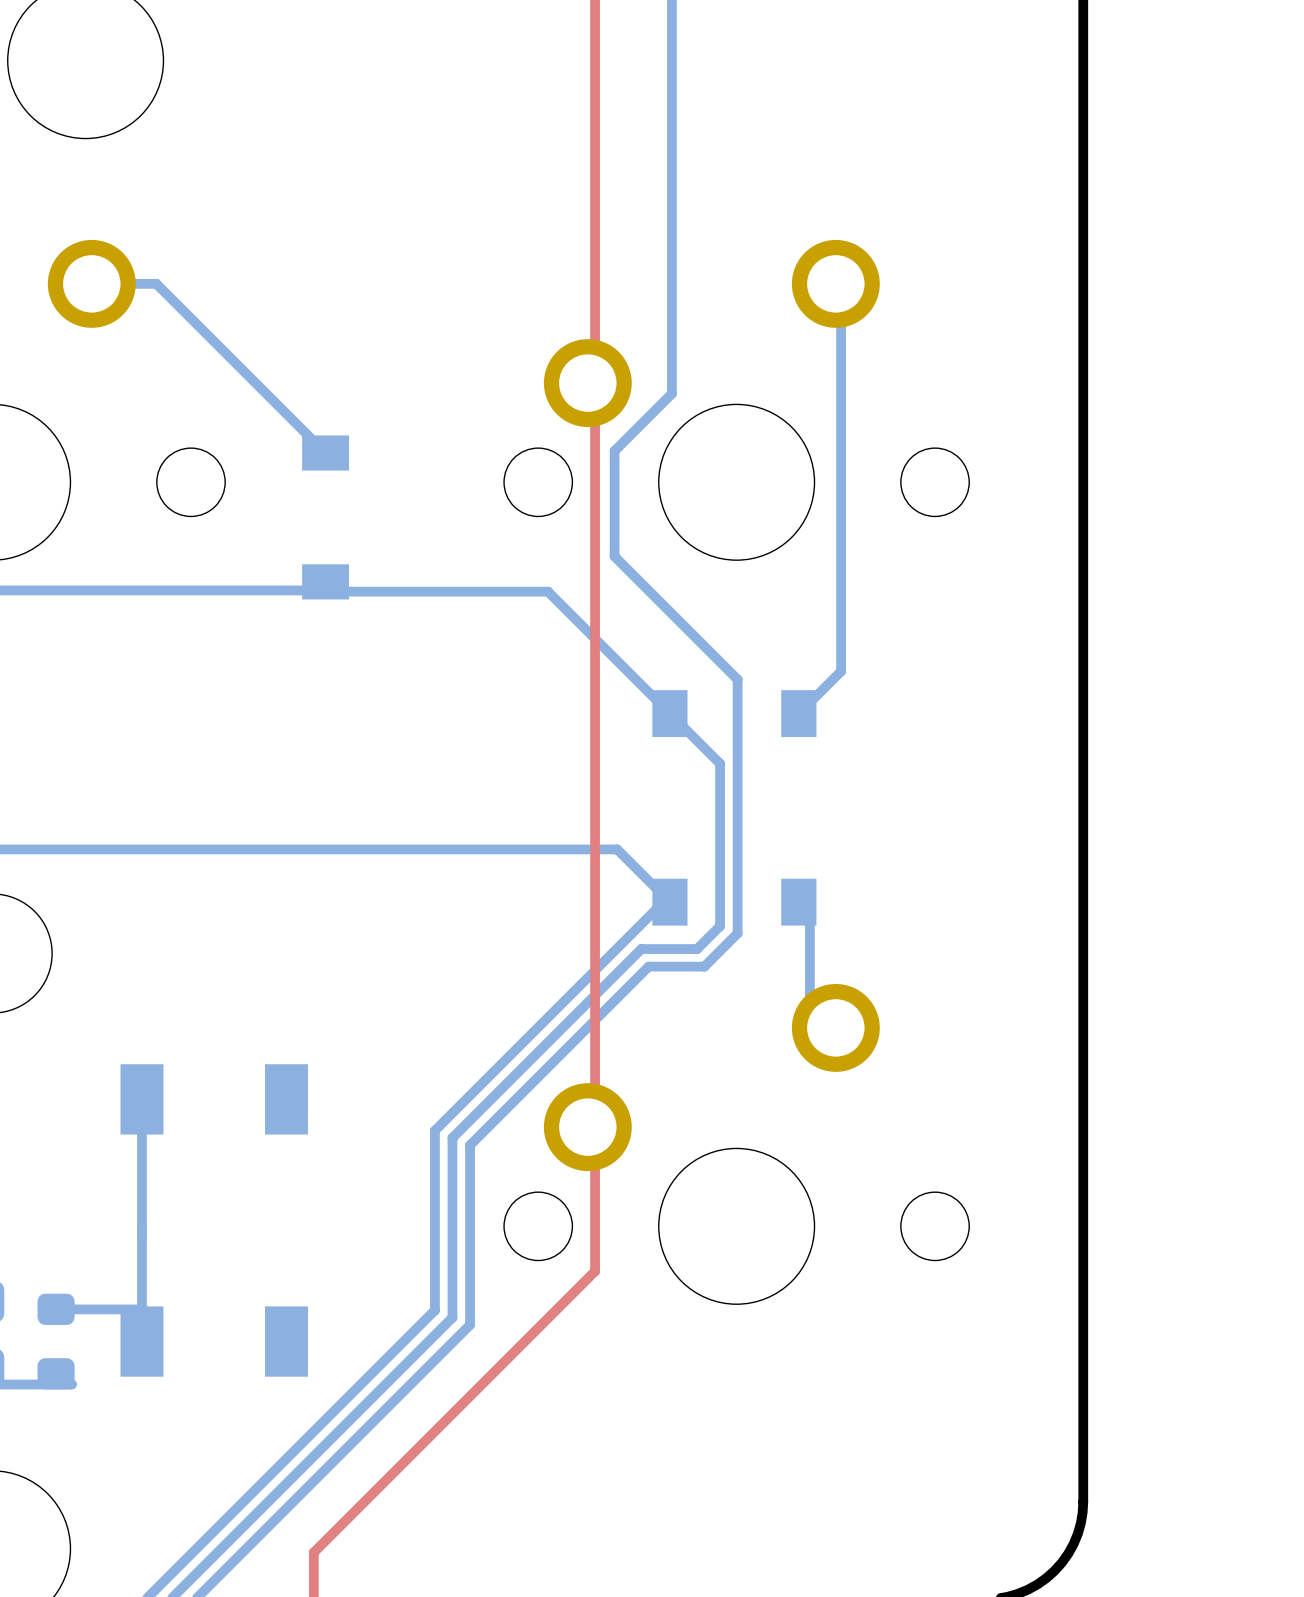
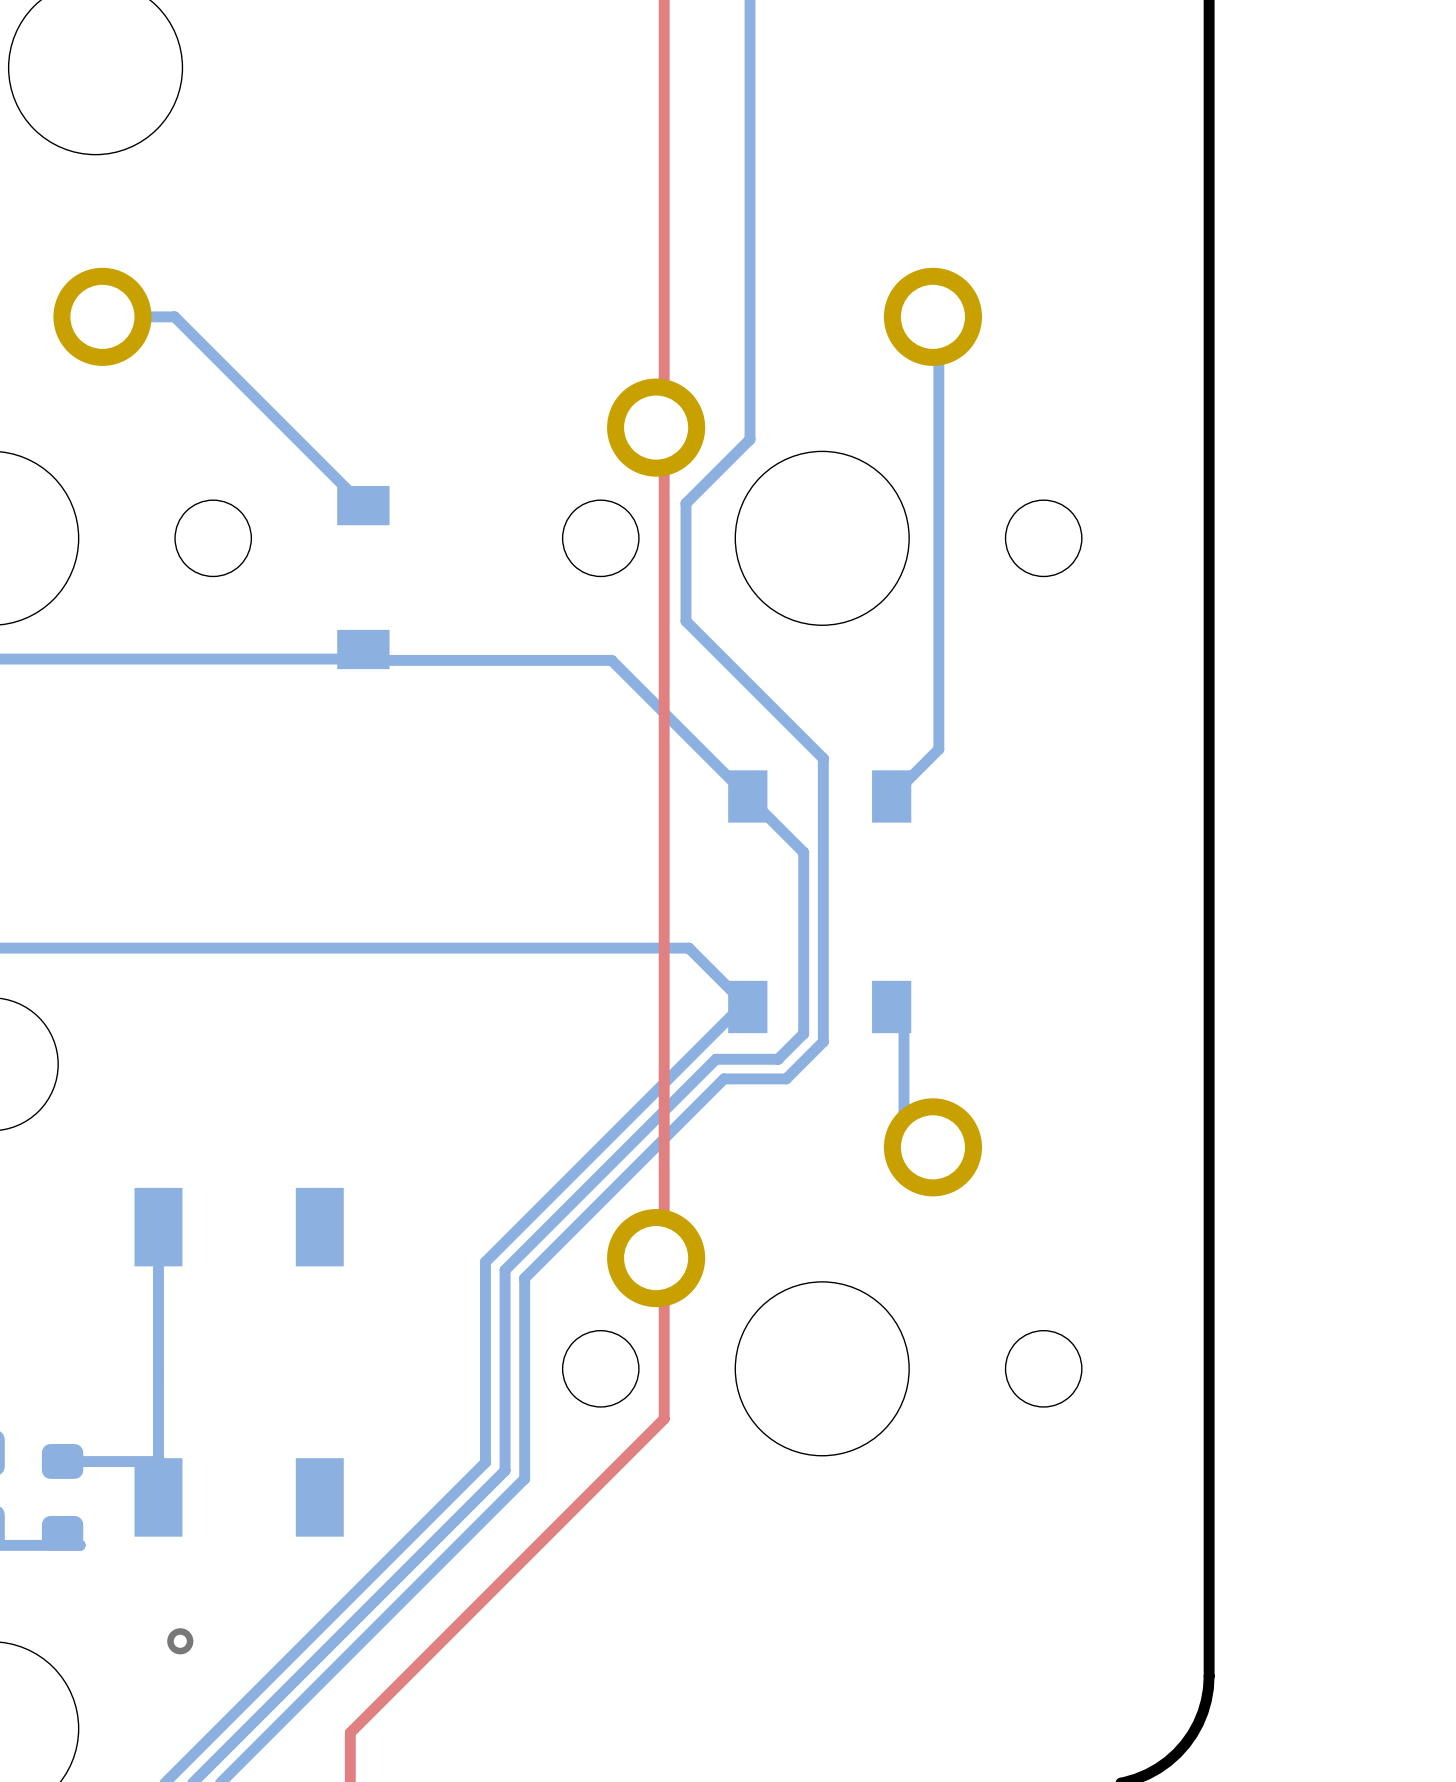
via: none -> (180, 1641)

